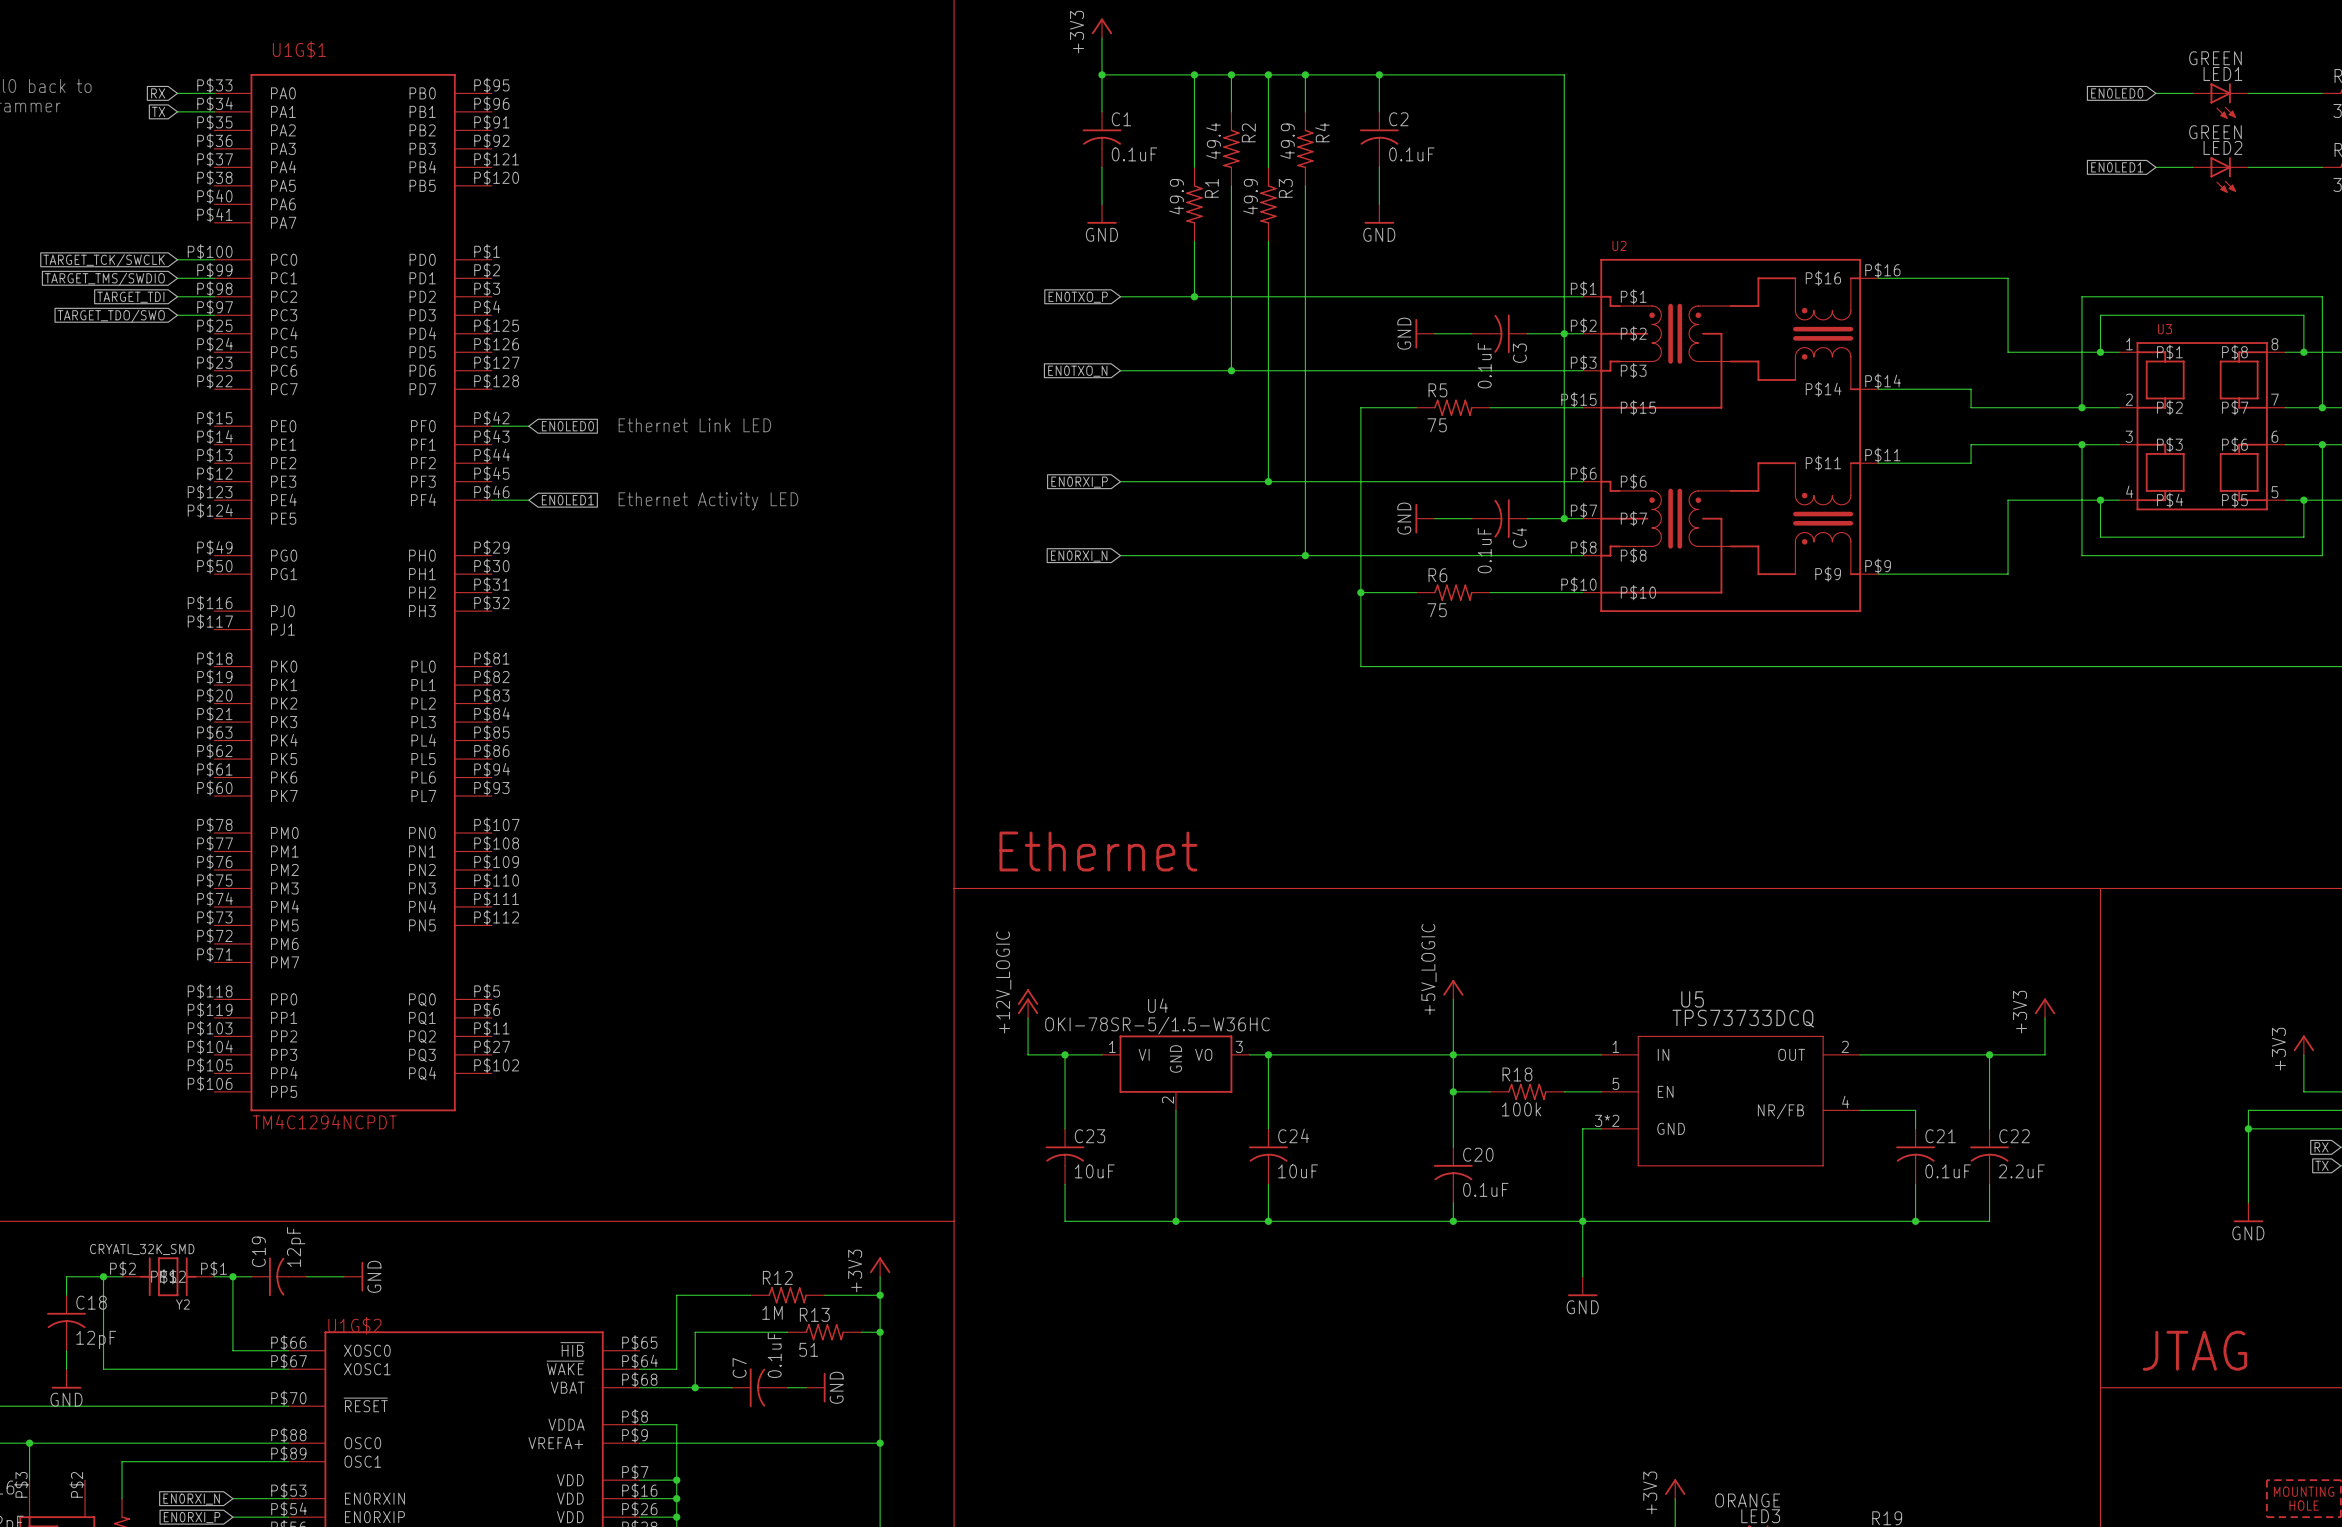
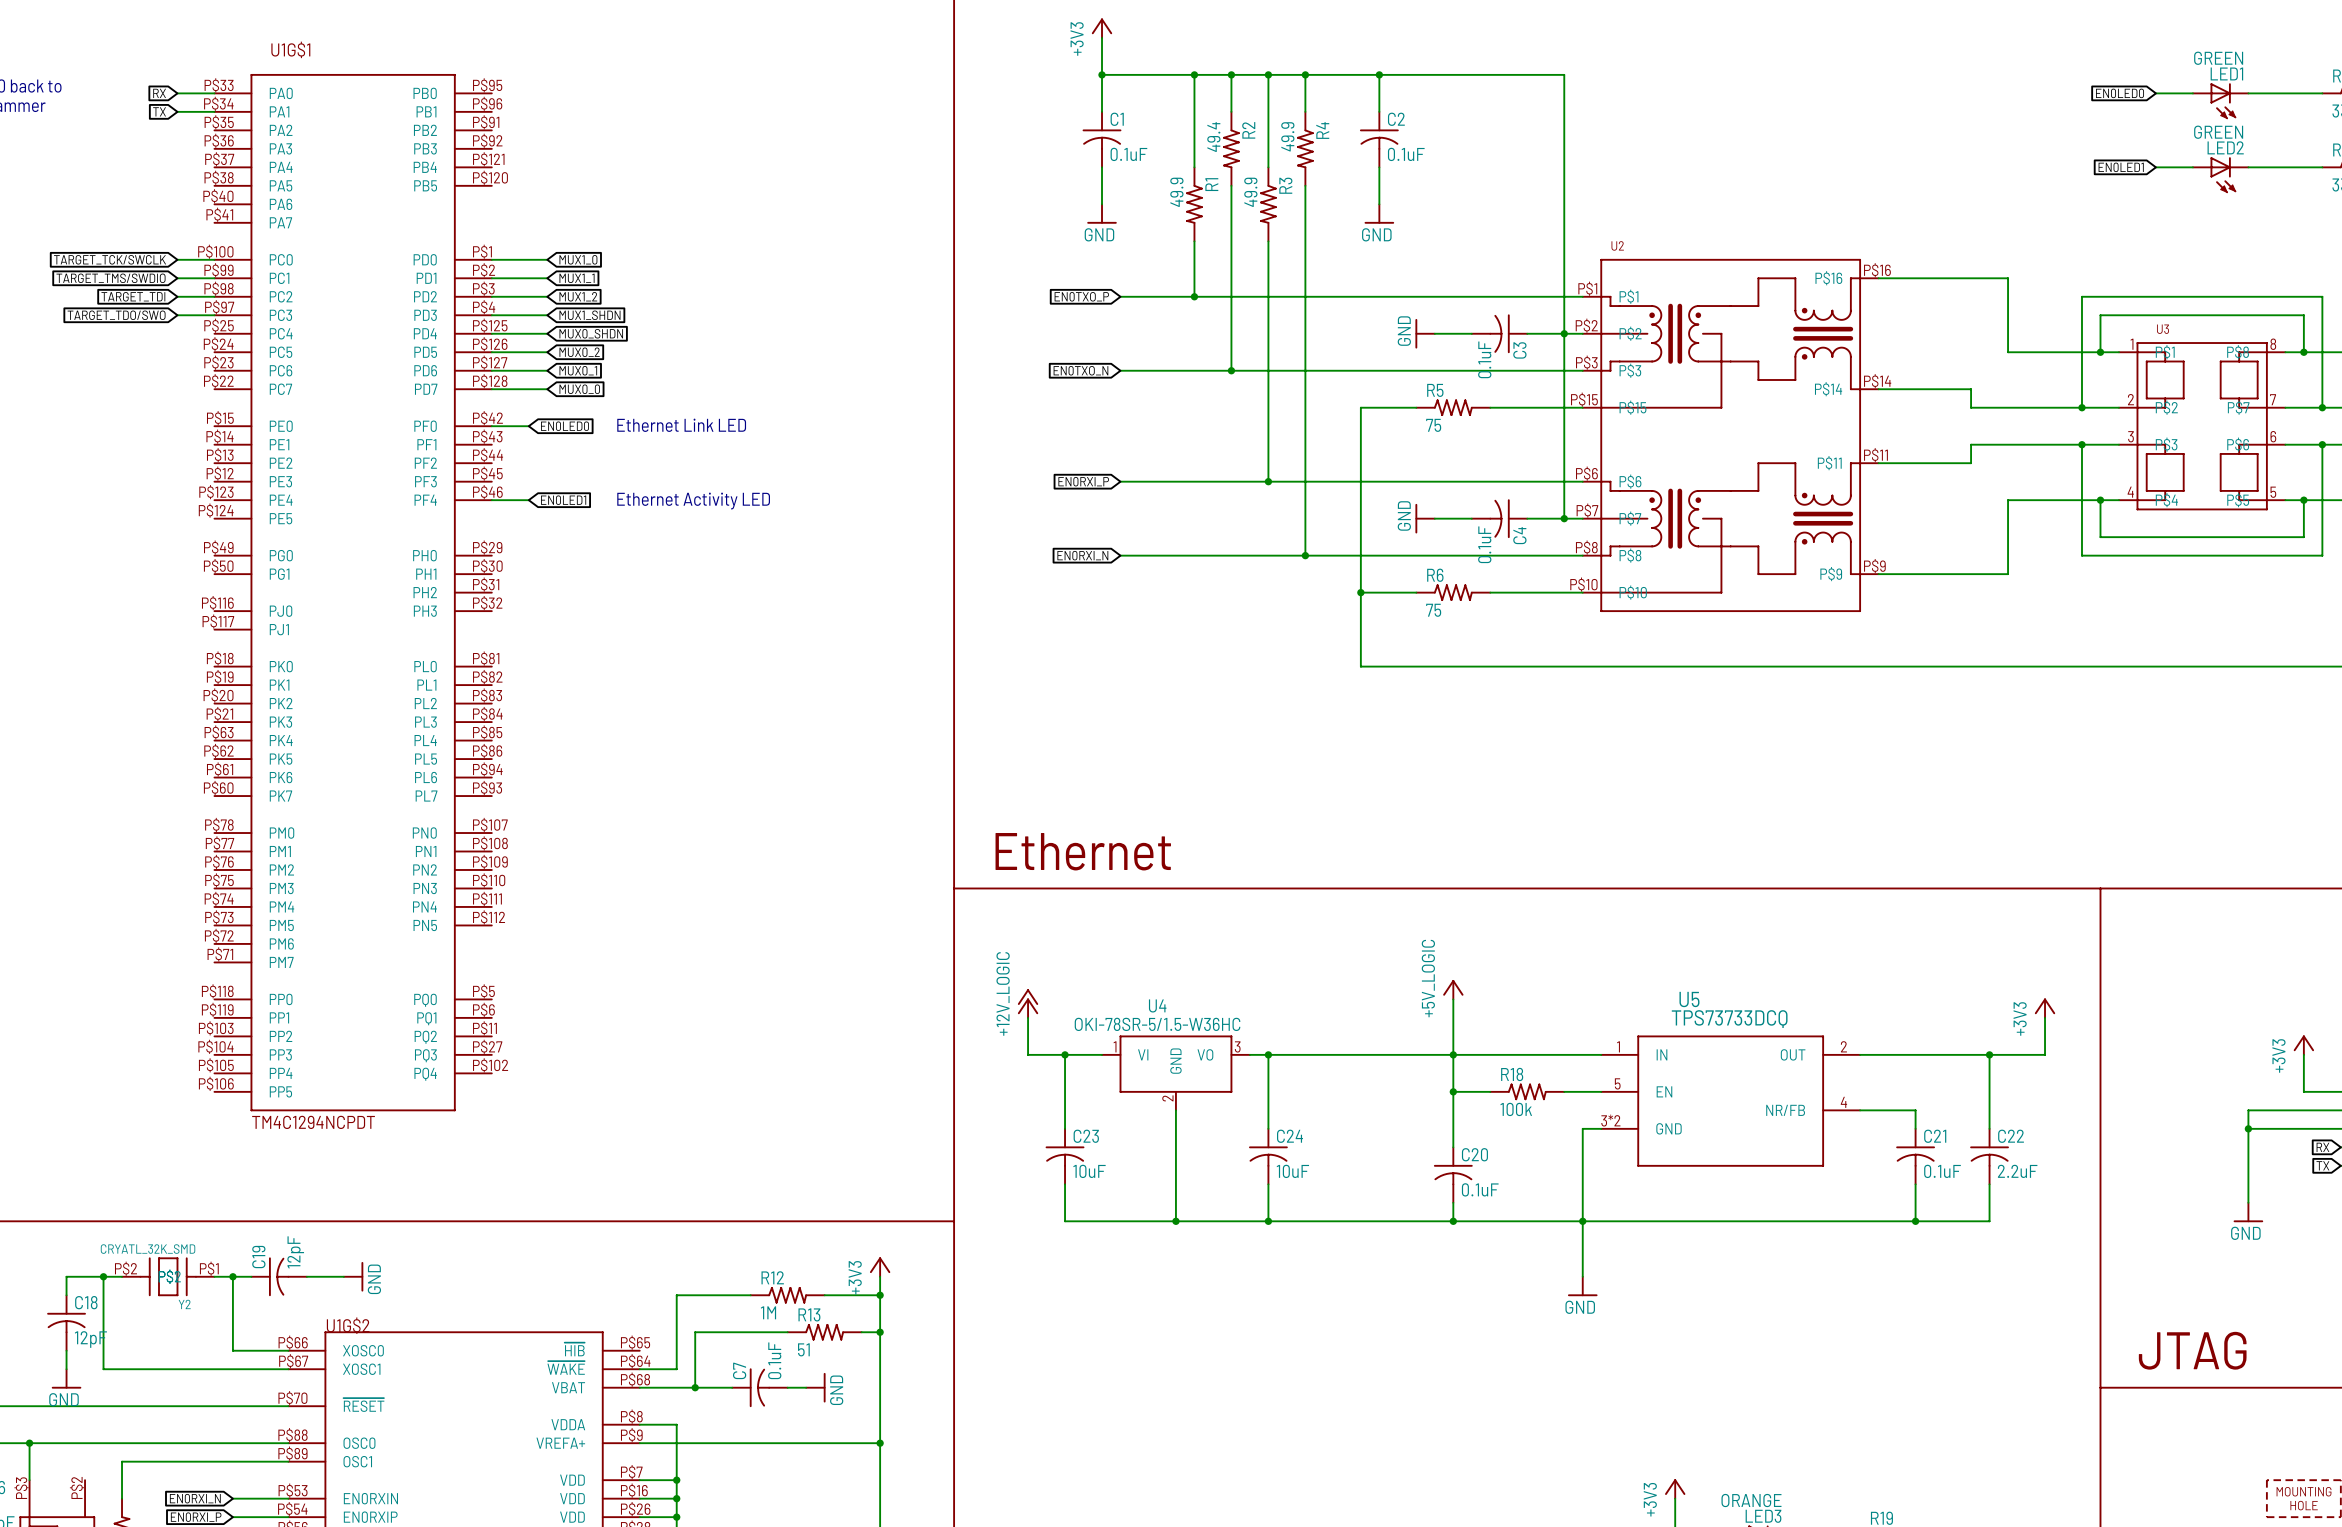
wire: none -> (491, 259) (547, 259)
global label: none -> MUX1_0 (578, 259)
wire: none -> (491, 278) (547, 278)
global label: none -> MUX1_1 (577, 278)
wire: none -> (491, 296) (547, 296)
global label: none -> MUX1_2 (578, 296)
wire: none -> (491, 315) (547, 315)
global label: none -> MUX1_SHDN (589, 315)
wire: none -> (491, 333) (547, 333)
global label: none -> MUX0_SHDN (591, 333)
wire: none -> (491, 352) (547, 352)
global label: none -> MUX0_2 (579, 352)
wire: none -> (491, 370) (547, 370)
global label: none -> MUX0_1 (578, 370)
wire: none -> (491, 389) (547, 389)
global label: none -> MUX0_0 (579, 389)

